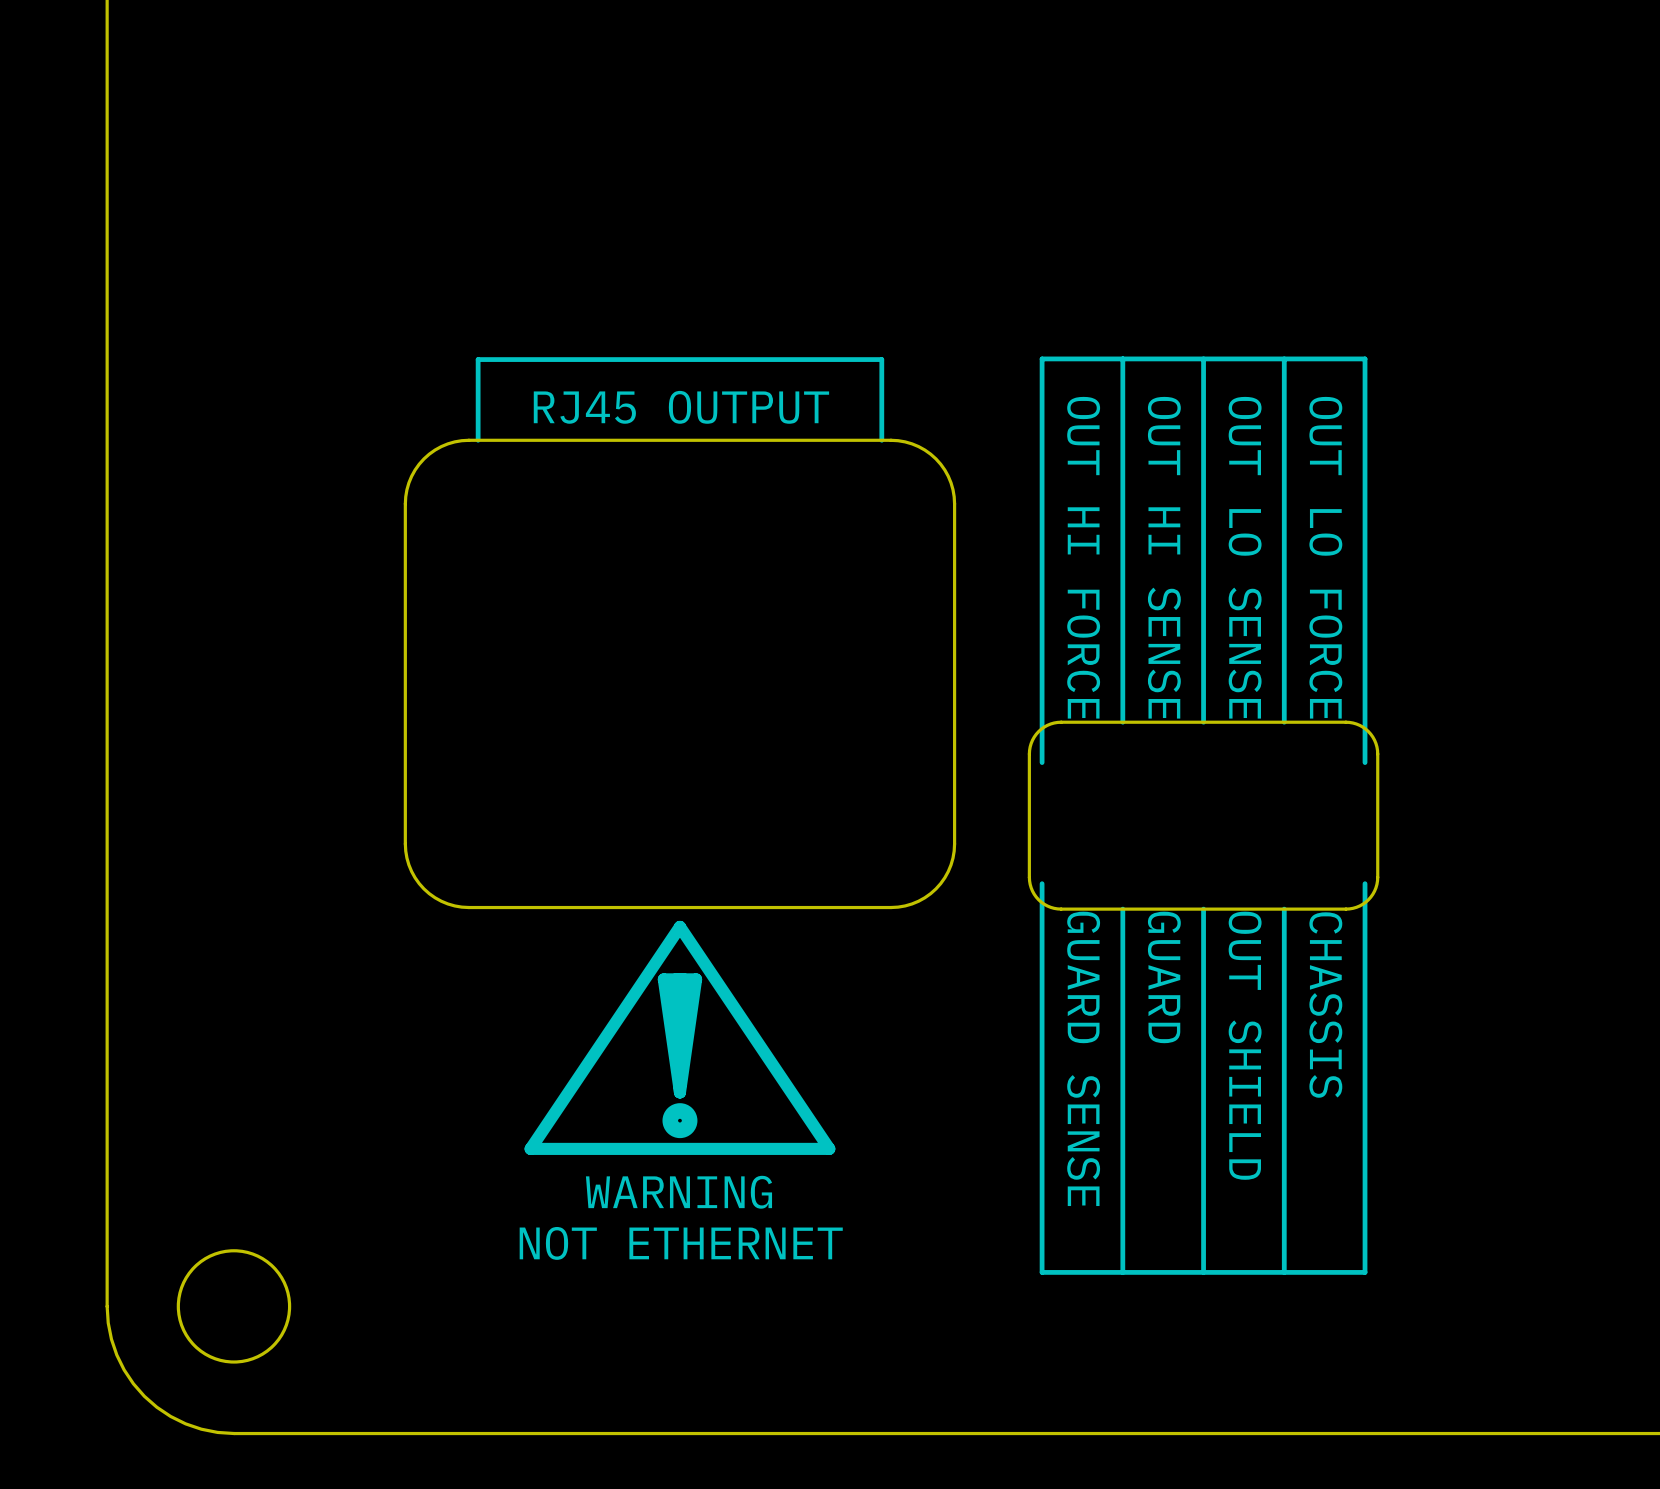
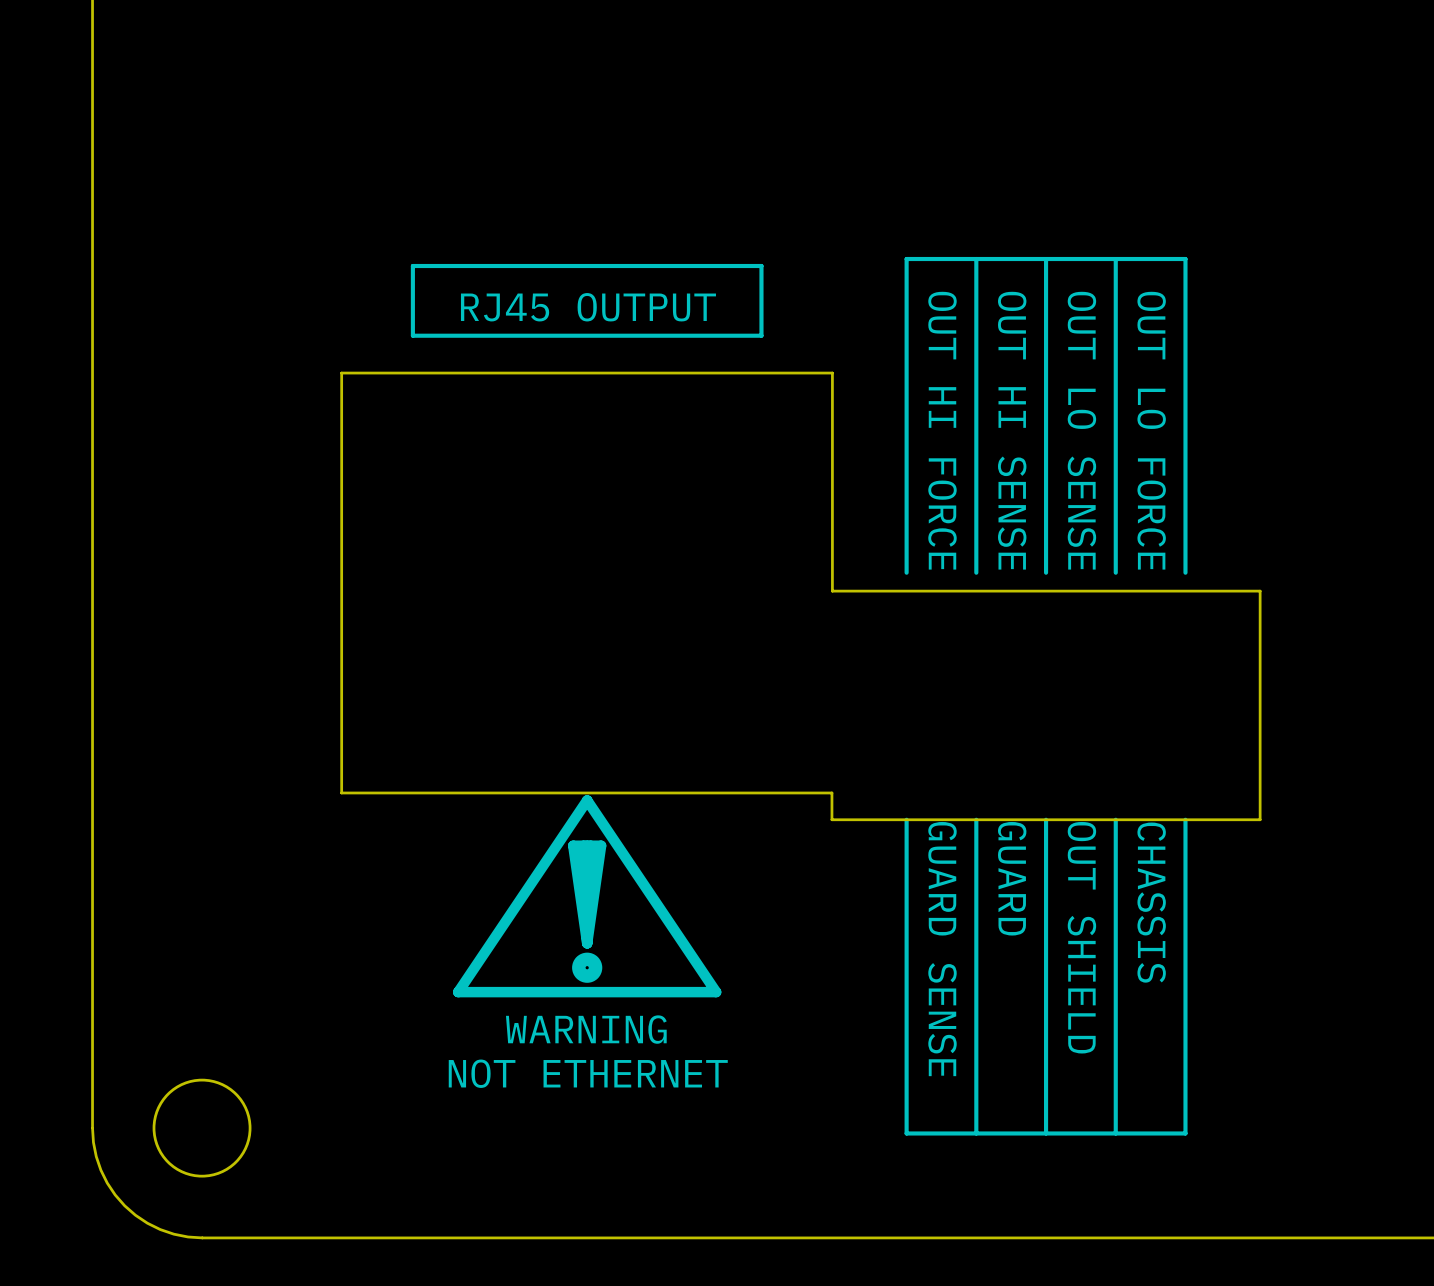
line: (1122, 358) (1122, 722) -> (976, 259) (976, 572)
line: (1203, 358) (1203, 722) -> (1046, 259) (1046, 572)
line: (1284, 358) (1284, 722) -> (1115, 259) (1115, 572)
line: (478, 359) (881, 359) -> (412, 310) (412, 266) (761, 266) (761, 310)
line: (478, 388) (478, 440) -> (412, 335) (761, 335)
line: (881, 388) (881, 440) -> none
text position: RJ45 OUTPUT (681, 407) -> RJ45 OUTPUT (588, 307)
board edge: none -> (341, 373) (341, 792) (831, 792) (831, 819) (1260, 819) (1260, 591) (832, 591) (832, 373) (341, 373)
board edge: (468, 440) (891, 440) (905, 441) (918, 446) (935, 458) (944, 470) (951, 482) (954, 503) (954, 843) (952, 858) (948, 871) (935, 888) (924, 897) (912, 903) (891, 907) (468, 907) (454, 905) (441, 901) (423, 888) (415, 877) (408, 864) (405, 843) (405, 496) (408, 482) (415, 470) (429, 454) (447, 443) (468, 440) -> none
text position: OUT HI FORCE (1083, 557) -> OUT HI FORCE (942, 430)
text position: OUT HI SENSE (1164, 557) -> OUT HI SENSE (1012, 430)
text position: OUT LO SENSE (1245, 557) -> OUT LO SENSE (1081, 430)
text position: OUT LO FORCE (1325, 557) -> OUT LO FORCE (1151, 430)
line: none -> (906, 572) (906, 259) (1185, 259) (1185, 572)
board edge: (1061, 722) (1345, 722) (1359, 725) (1370, 734) (1377, 750) (1377, 877) (1374, 891) (1362, 904) (1345, 909) (1061, 909) (1047, 905) (1036, 897) (1029, 880) (1029, 750) (1032, 740) (1041, 729) (1050, 724) (1061, 722) -> none
line: (1042, 762) (1042, 358) (1365, 358) (1365, 762) -> none
line: (1042, 883) (1042, 1272) (1365, 1272) (1365, 883) -> none
line: (1122, 909) (1122, 1272) -> (976, 819) (976, 1133)
line: (1203, 909) (1203, 1272) -> (1046, 819) (1046, 1133)
line: (1284, 909) (1284, 1272) -> (1115, 819) (1115, 1133)
line: none -> (906, 819) (906, 1133) (1185, 1133) (1185, 819)
text position: GUARD (1164, 977) -> GUARD (1012, 878)
text position: CHASSIS (1325, 1005) -> CHASSIS (1151, 902)
text position: OUT SHIELD (1245, 1045) -> OUT SHIELD (1081, 937)
text position: GUARD SENSE (1083, 1058) -> GUARD SENSE (942, 949)

